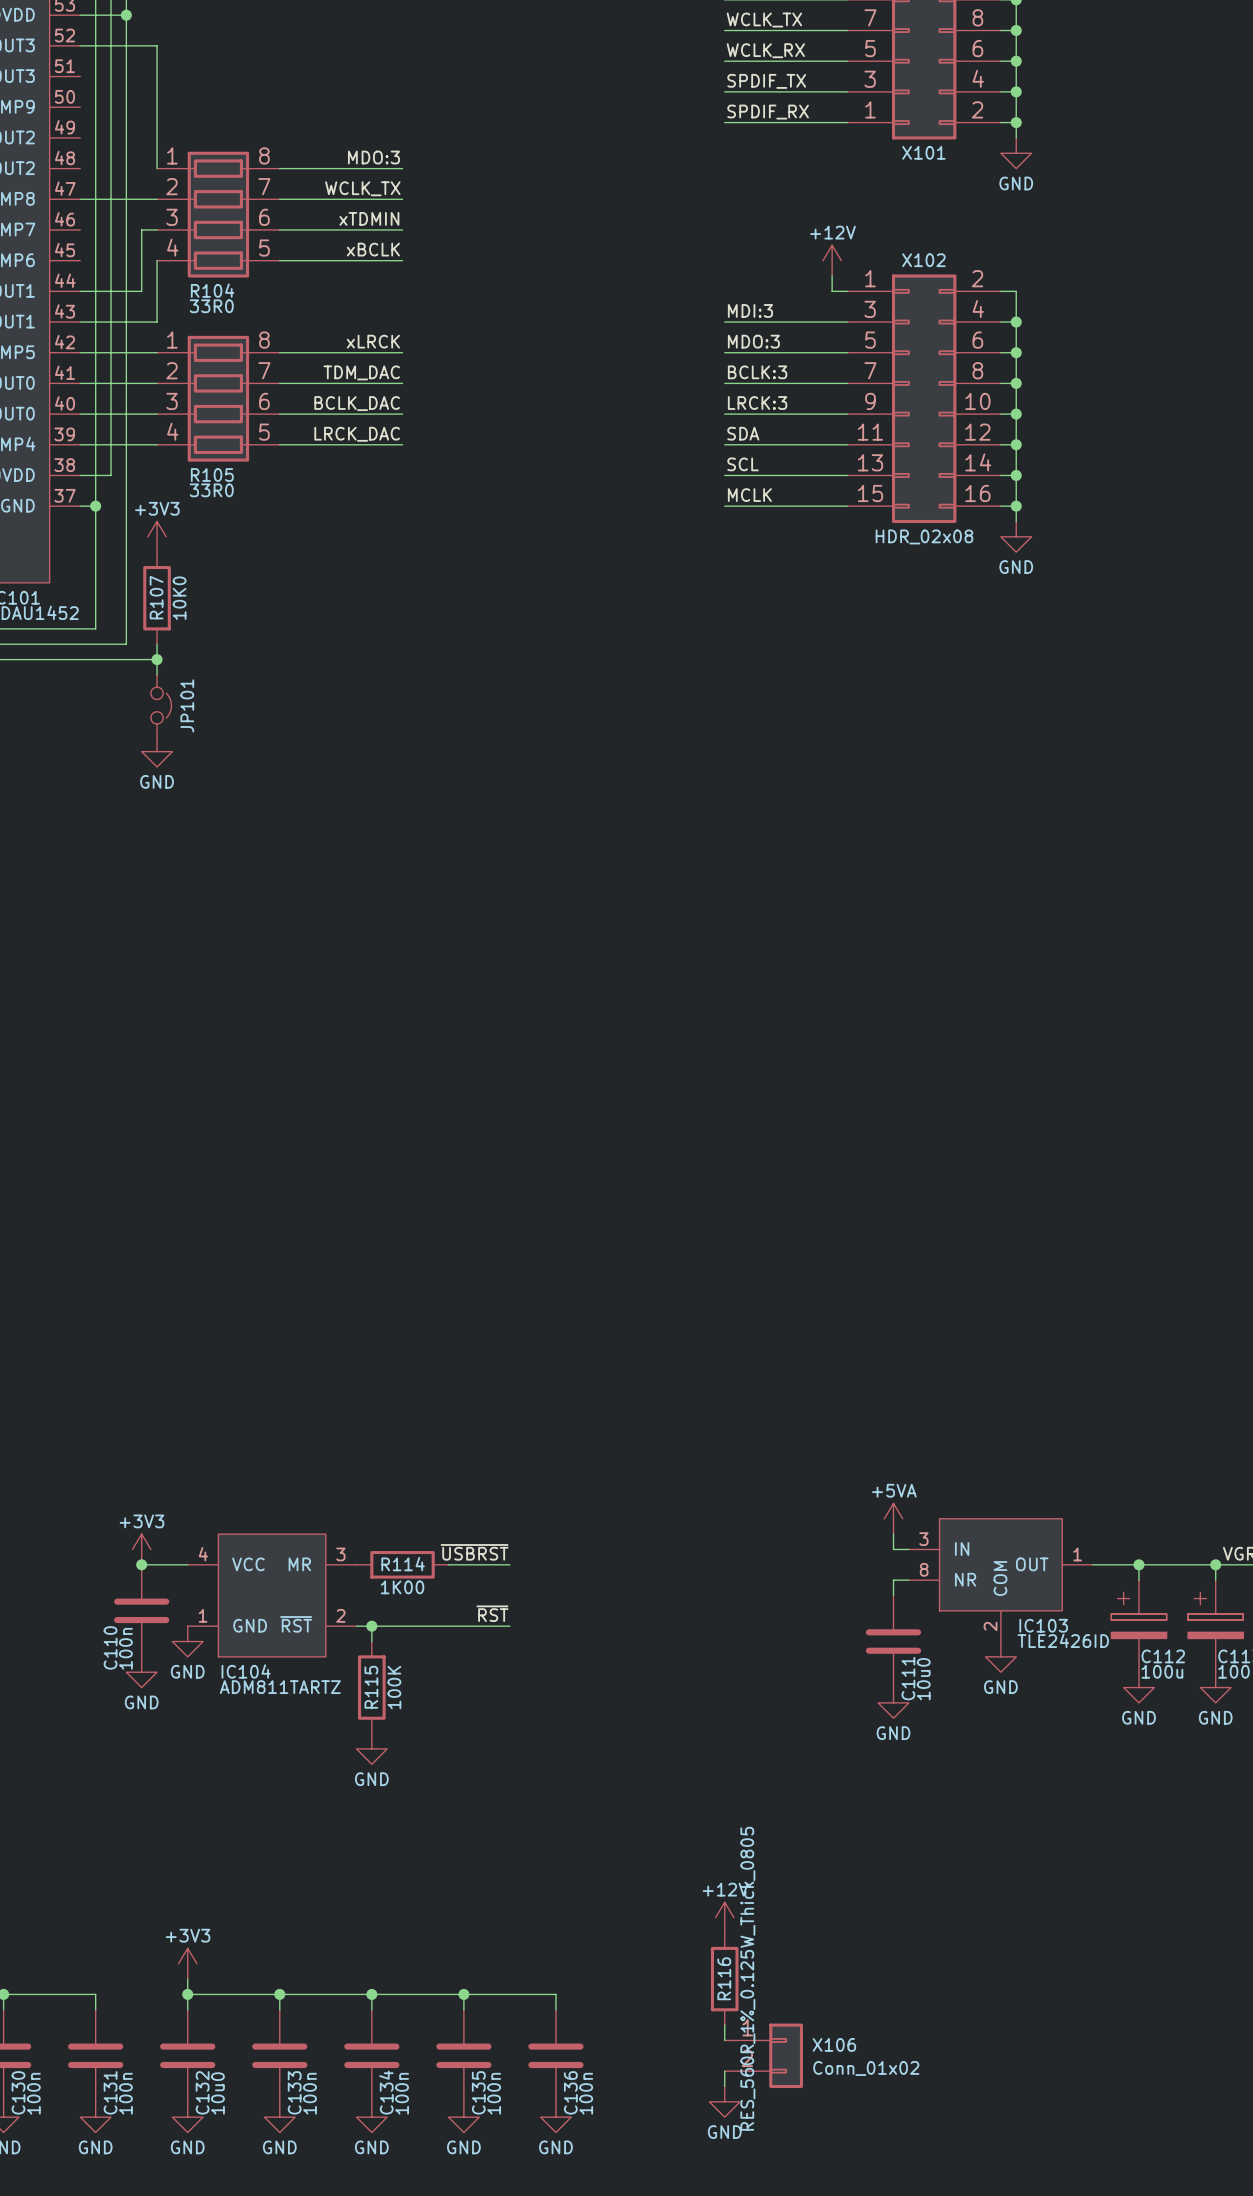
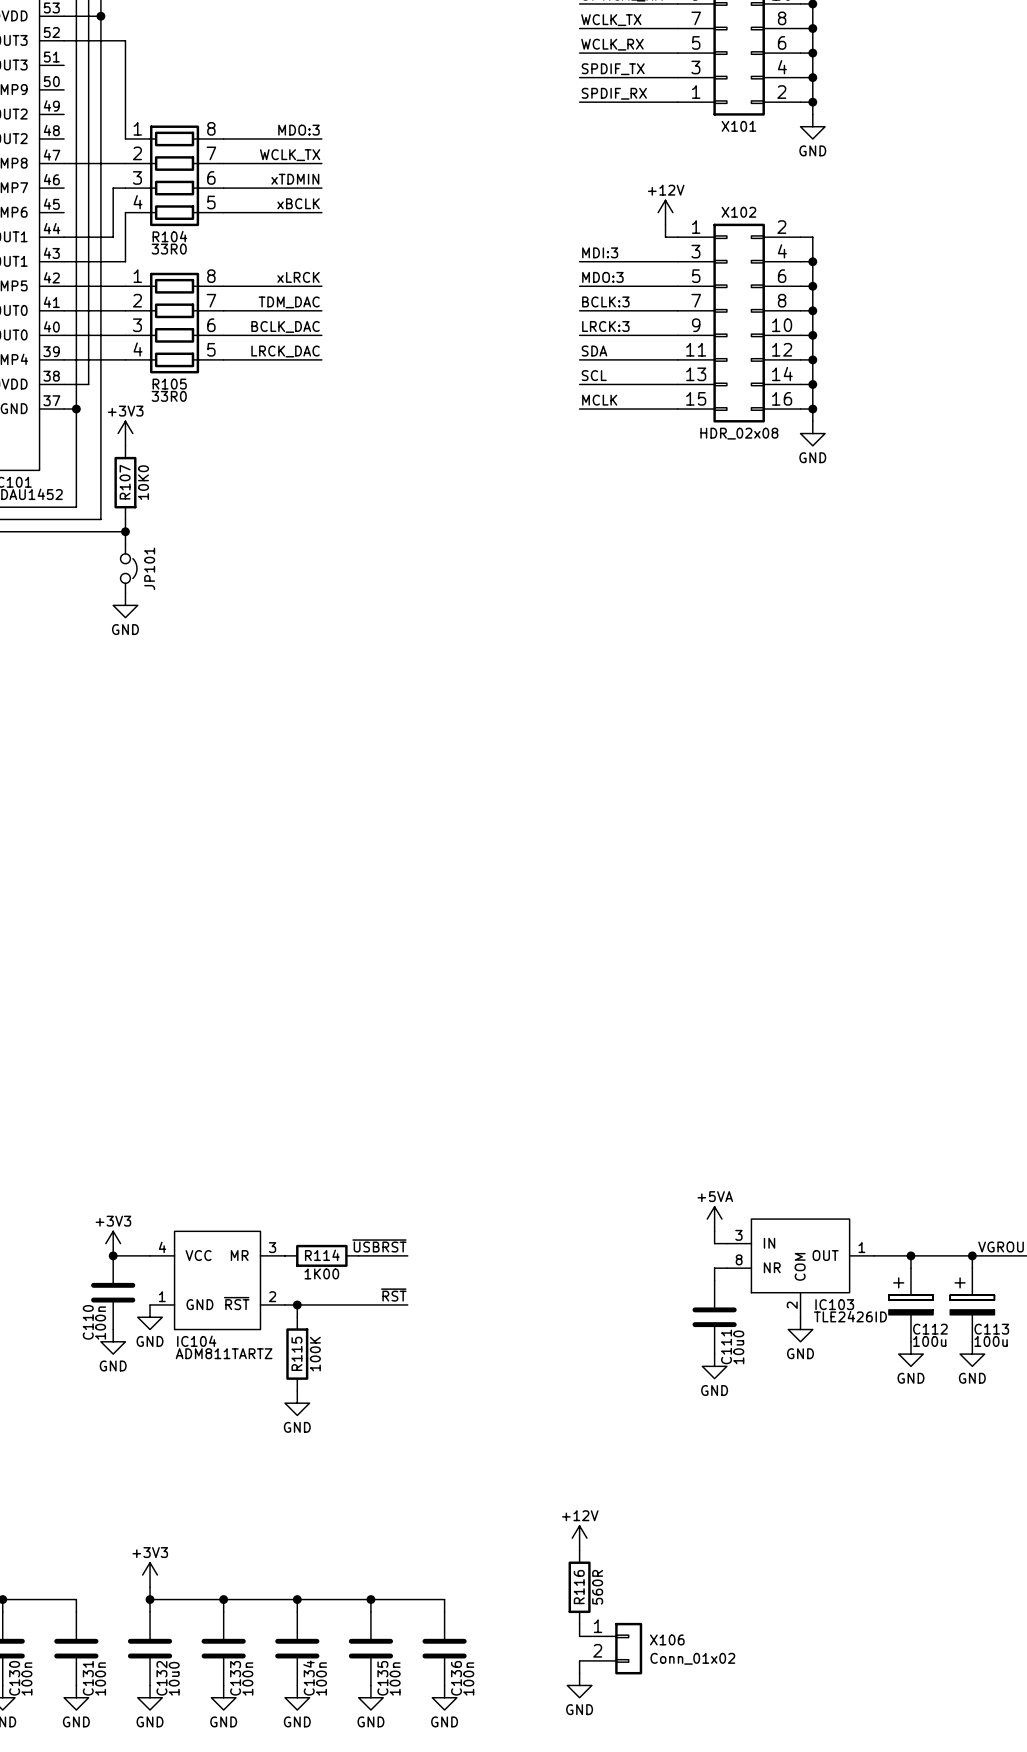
R116 value: RES_560R_1%_0.125W_Thick_0805 (747, 1978) -> 560R (597, 1587)

